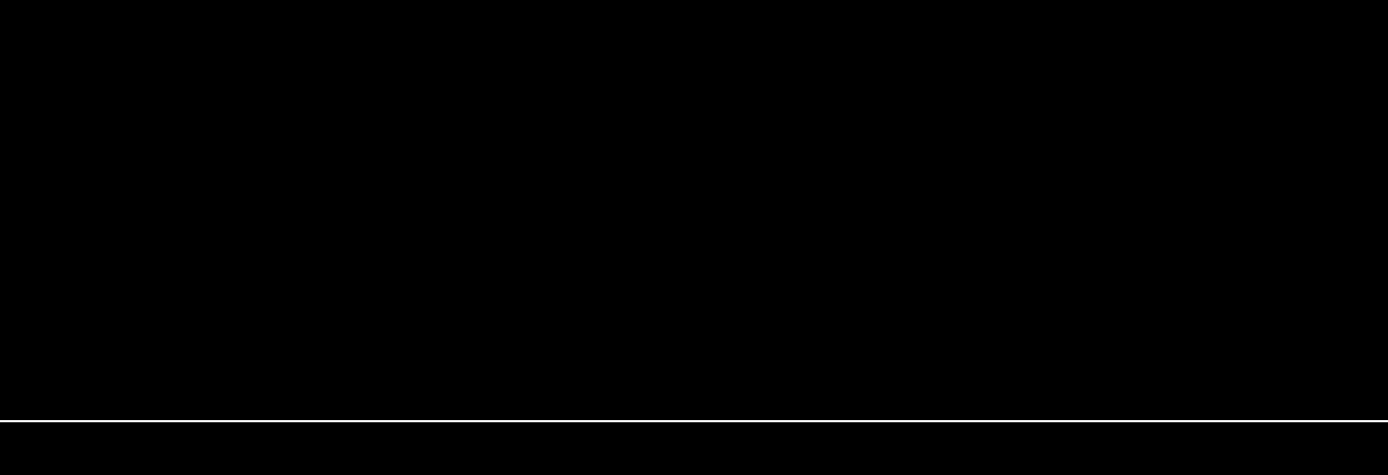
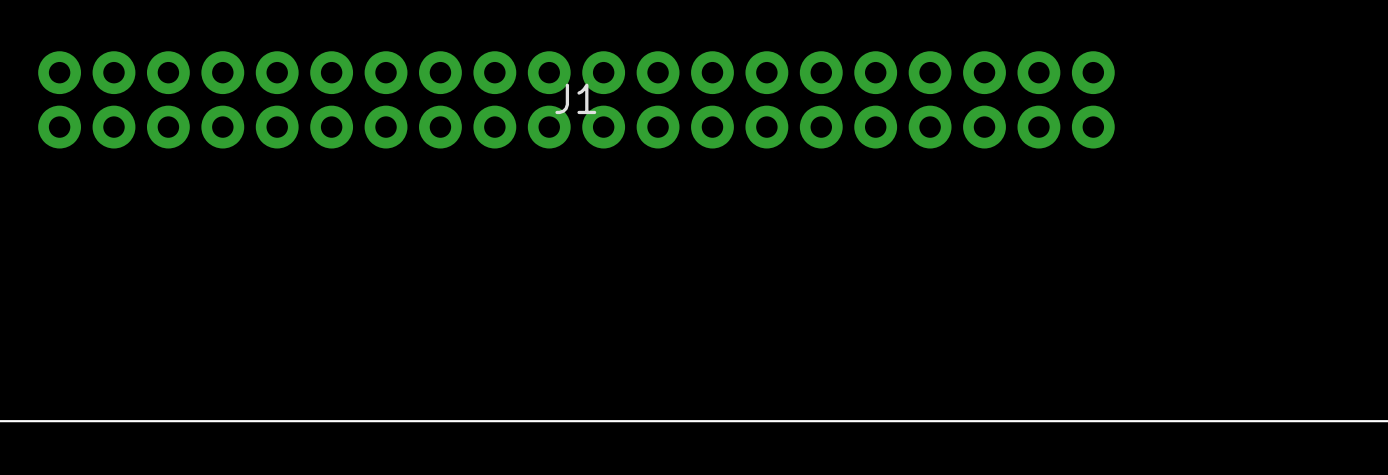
J1: none -> (576, 99)

